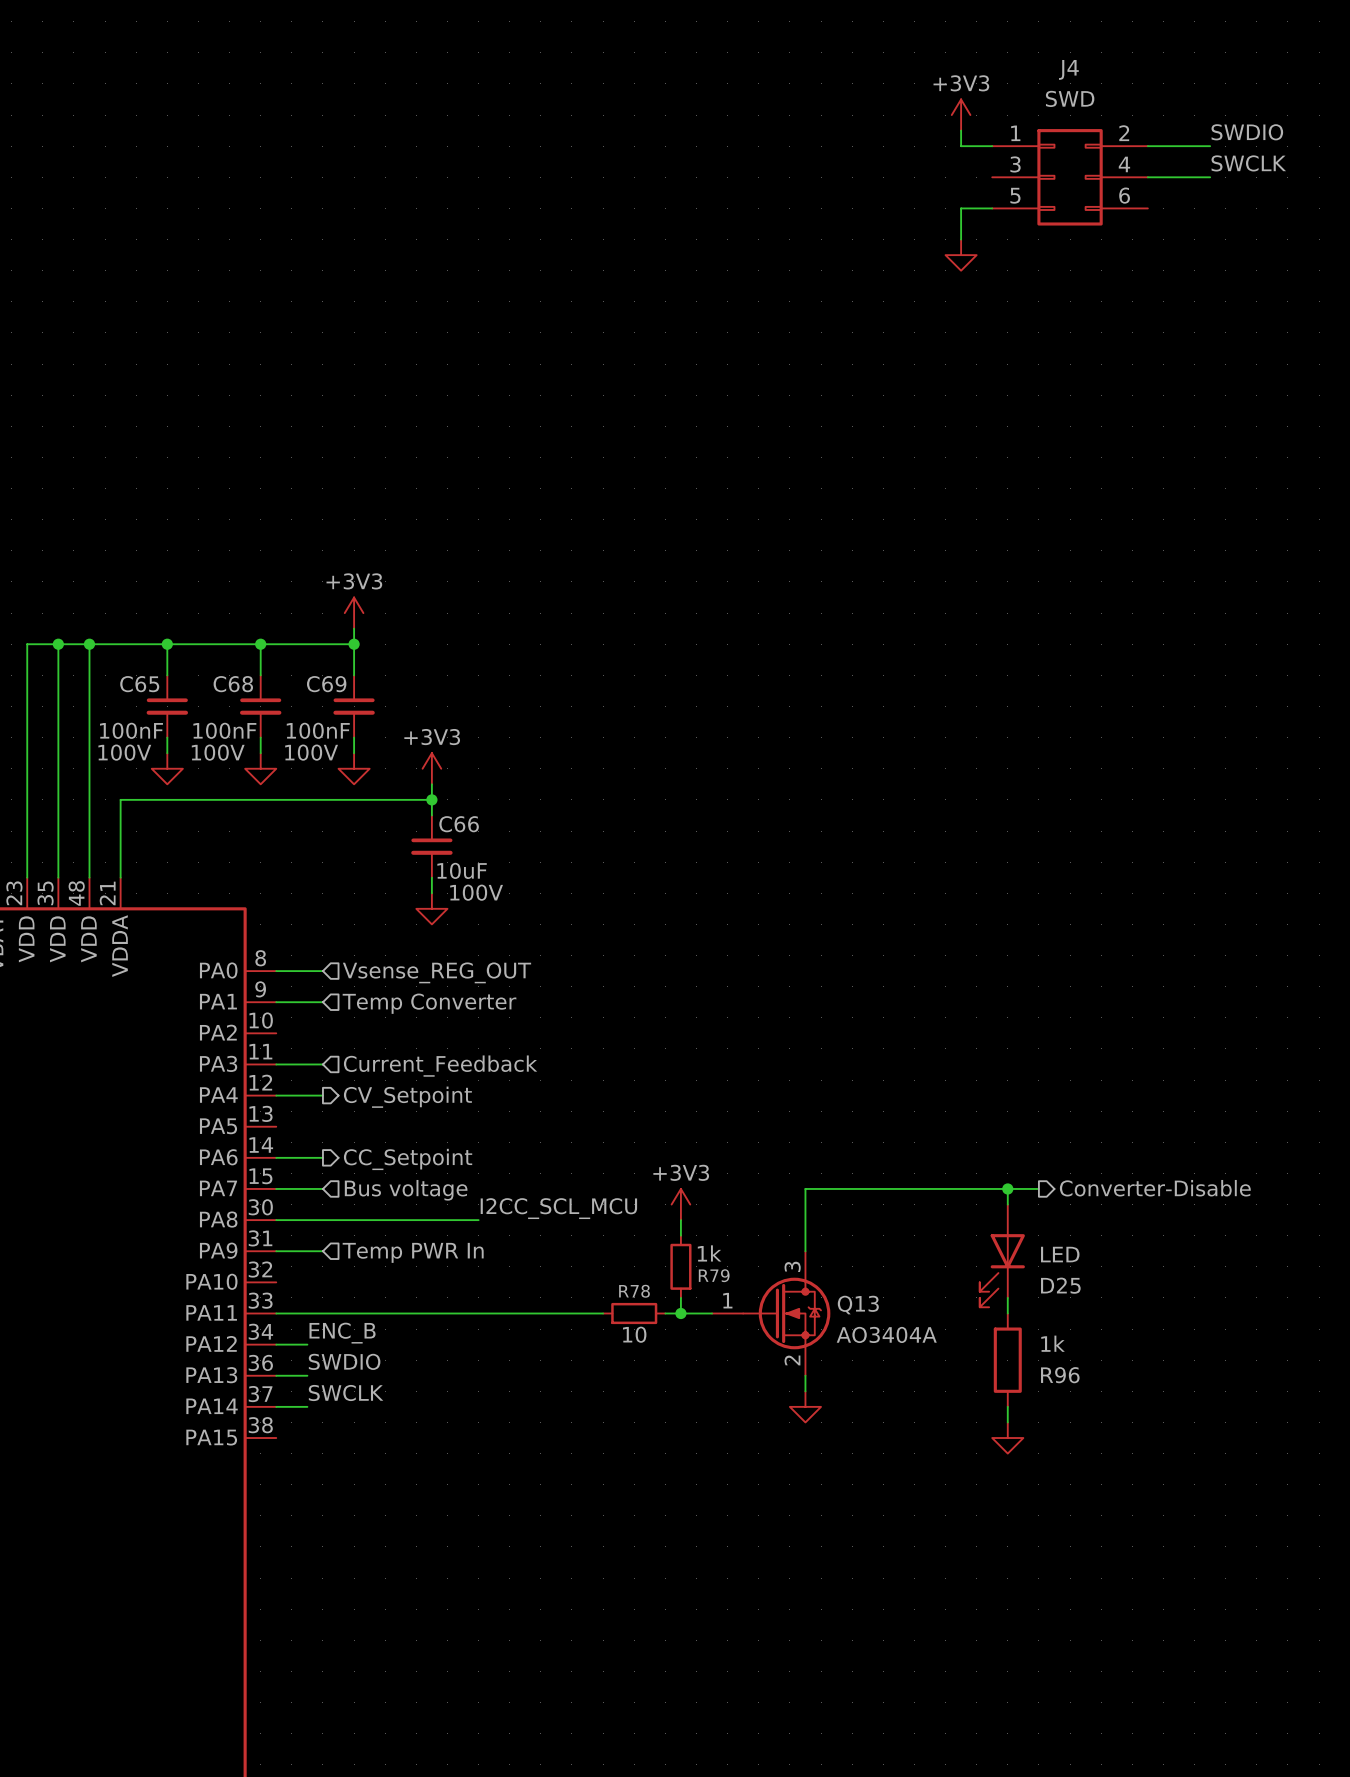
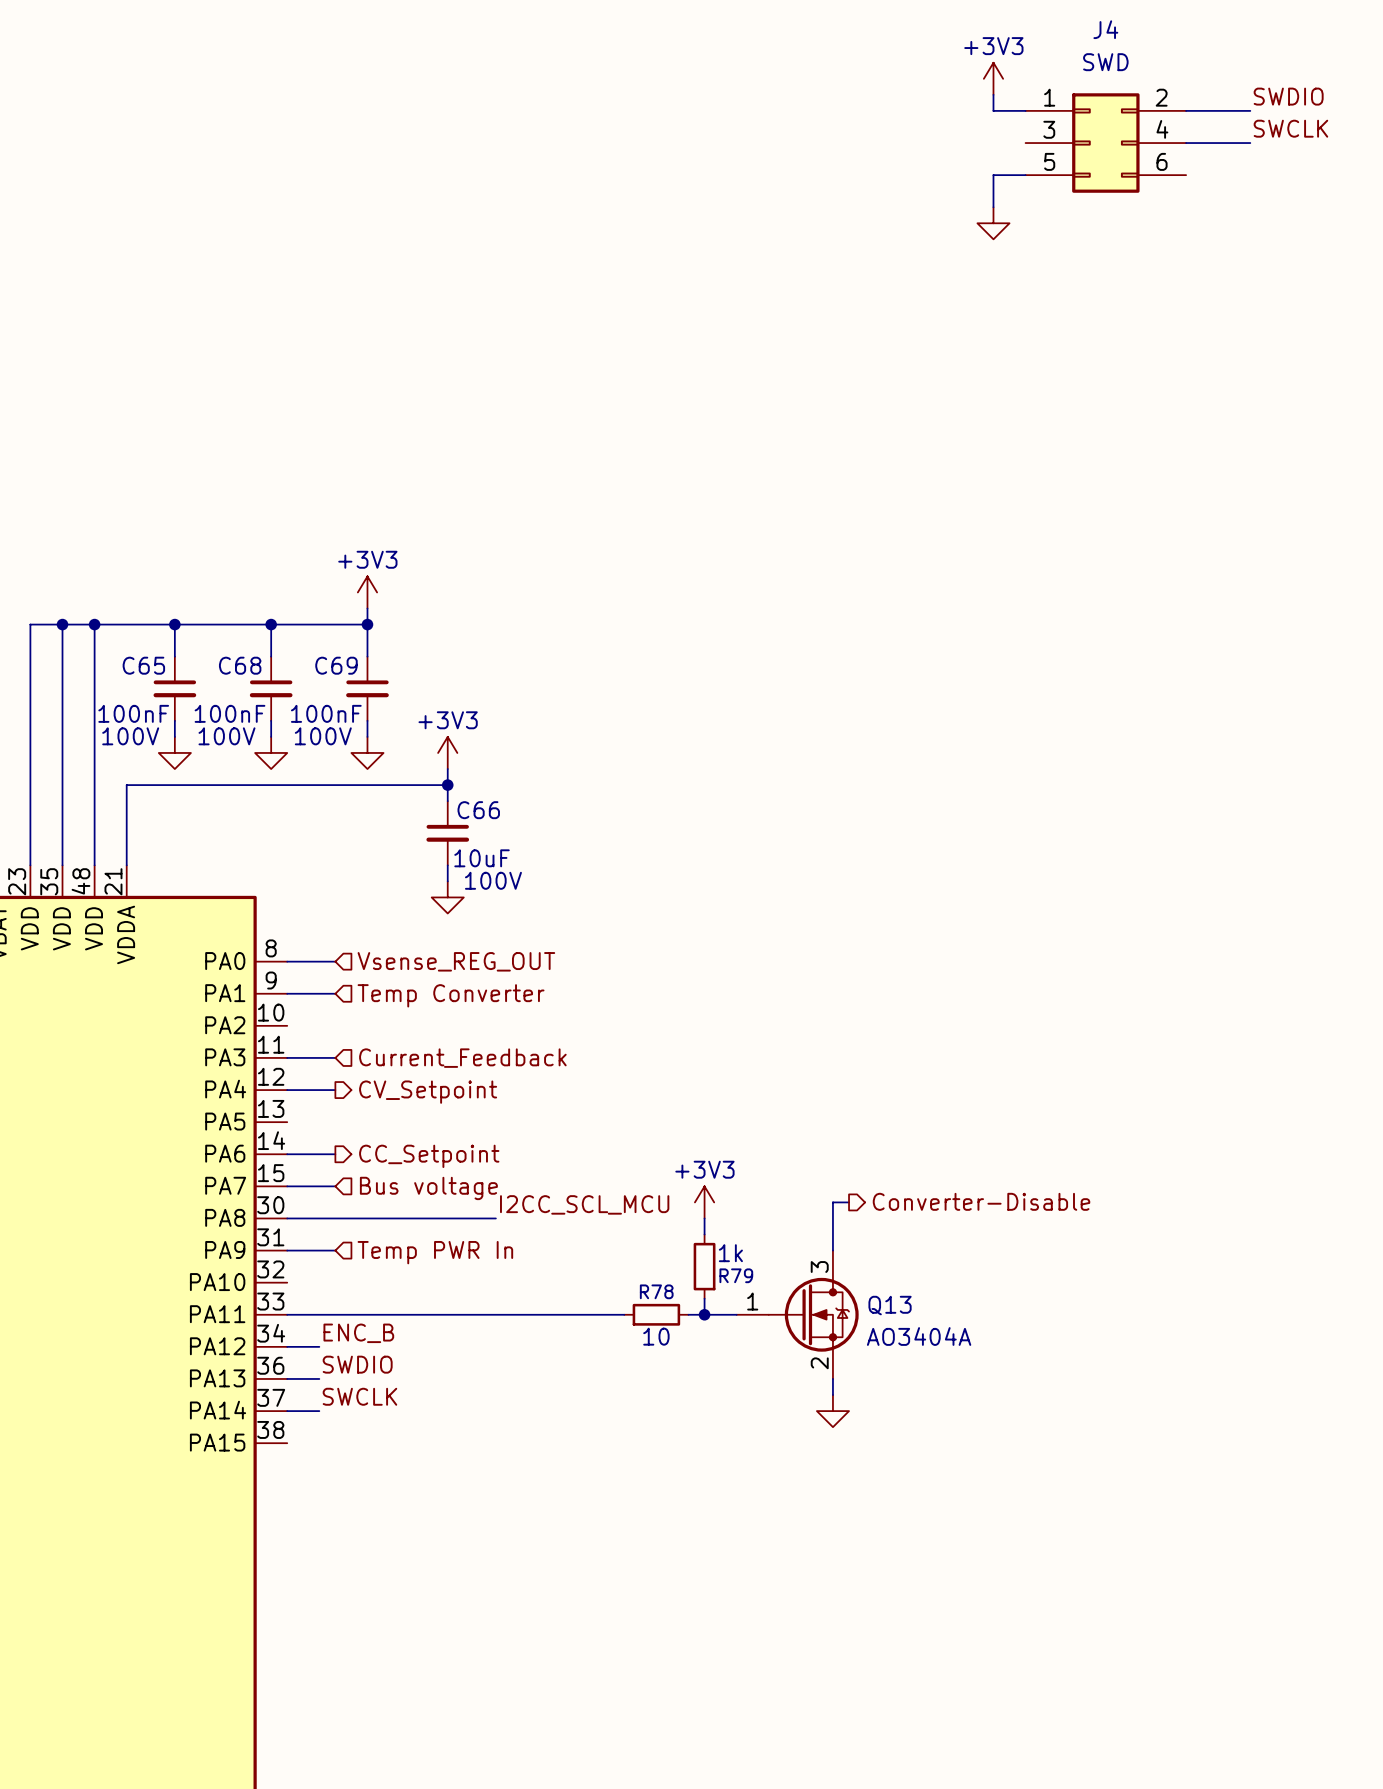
wire: (1007, 1188) (1007, 1204) -> none
junction: (1007, 1188) -> none
wire: (1038, 1188) (805, 1188) (805, 1204) -> (849, 1202) (832, 1202)
hierarchical label position: Converter-Disable (1155, 1188) -> Converter-Disable (981, 1201)
D25: LED (1002, 1255) -> none
wire: (1007, 1297) (1007, 1313) -> none
R96: 1k (1007, 1360) -> none
wire: (1007, 1406) (1007, 1422) -> none
power symbol: (1007, 1438) -> none

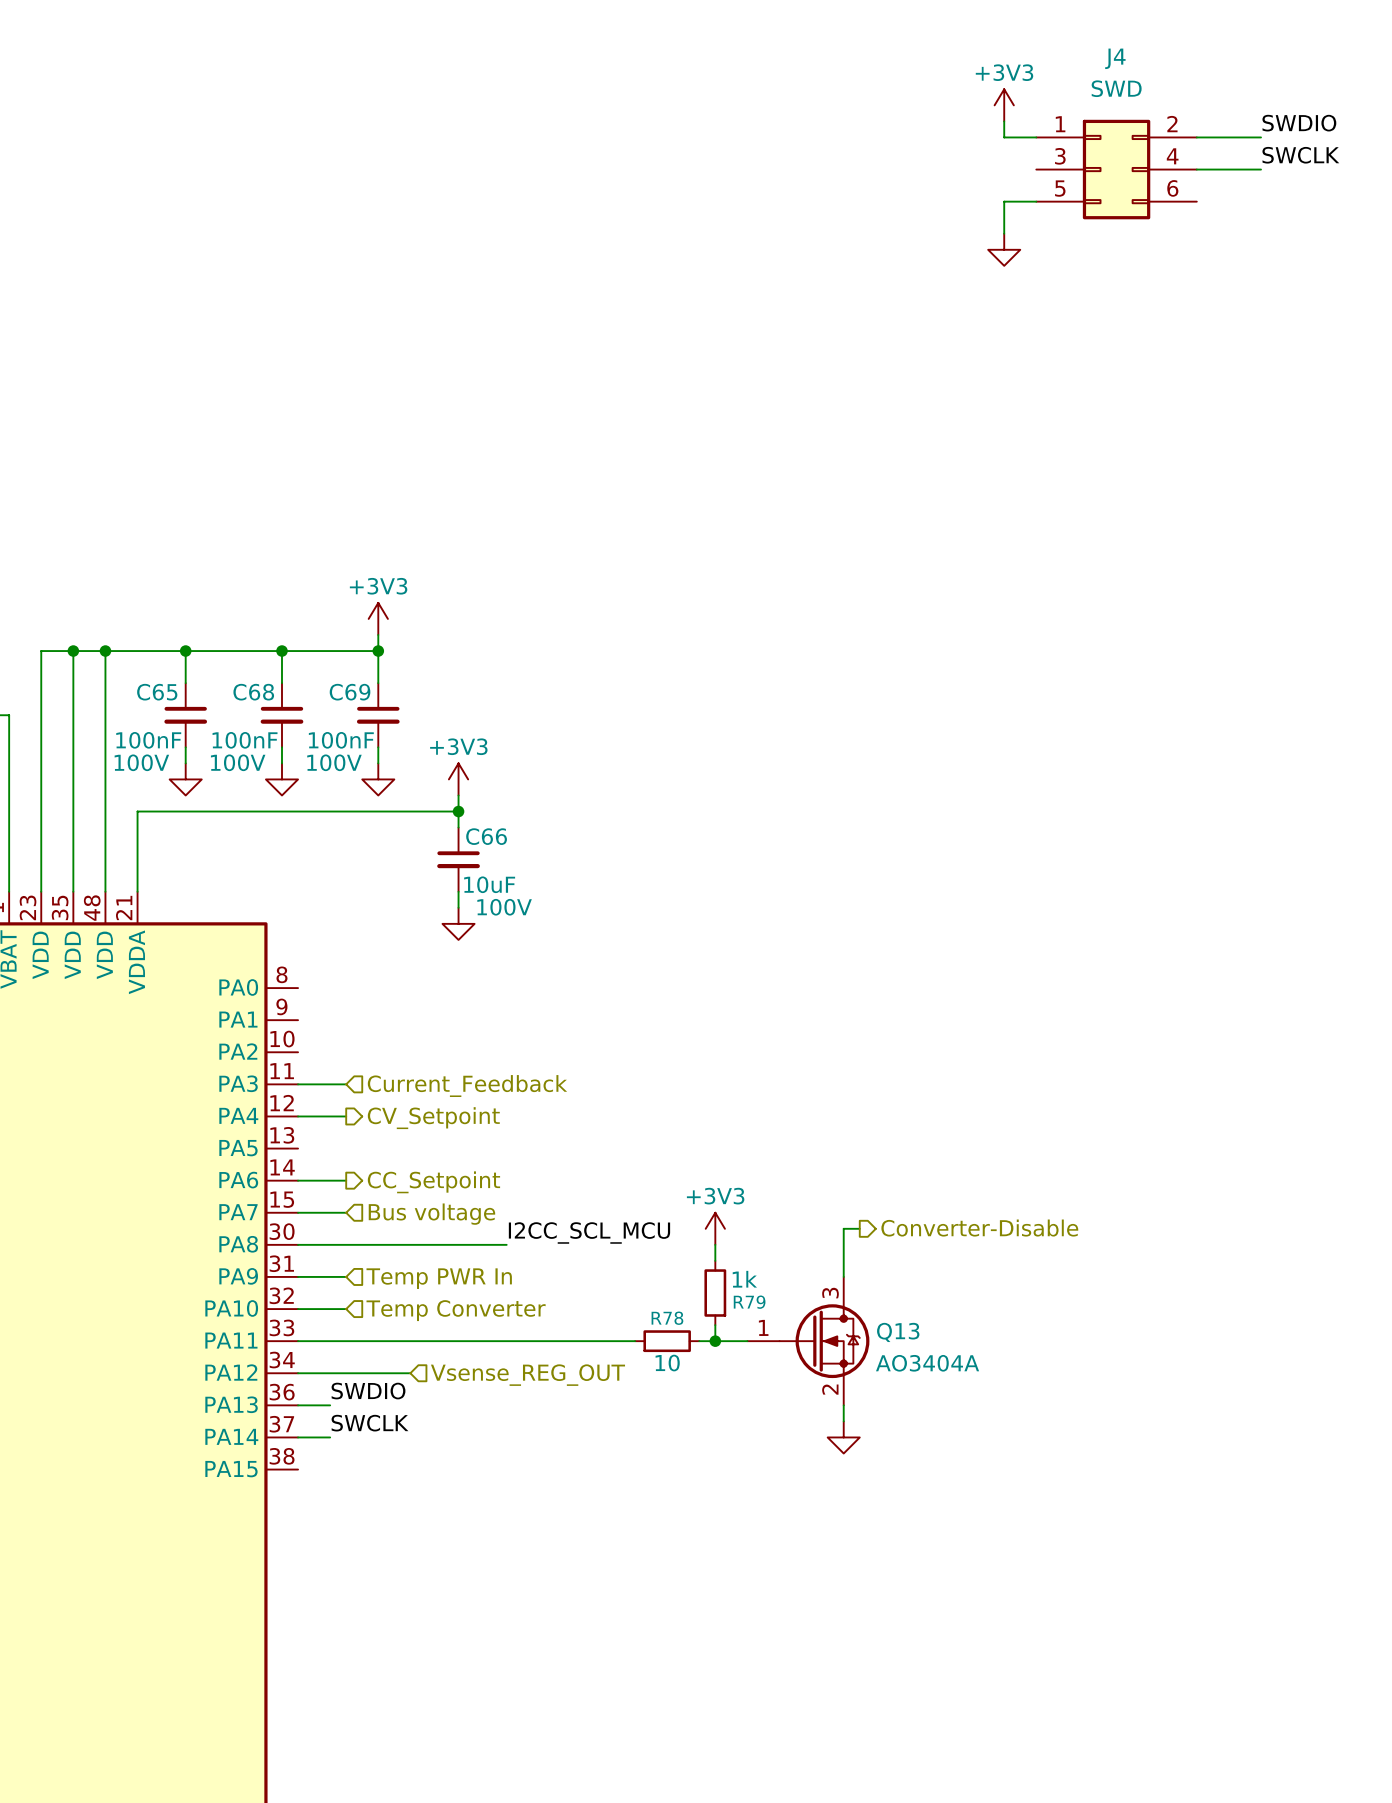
wire: (287, 961) (335, 961) -> none
hierarchical label: Vsense_REG_OUT (456, 961) -> none
wire: (287, 993) (335, 993) -> (298, 1309) (346, 1309)
hierarchical label position: Temp Converter (451, 995) -> Temp Converter (456, 1310)
label: ENC_B (358, 1333) -> none
wire: none -> (330, 1373) (410, 1373)
hierarchical label: none -> Vsense_REG_OUT (527, 1375)

